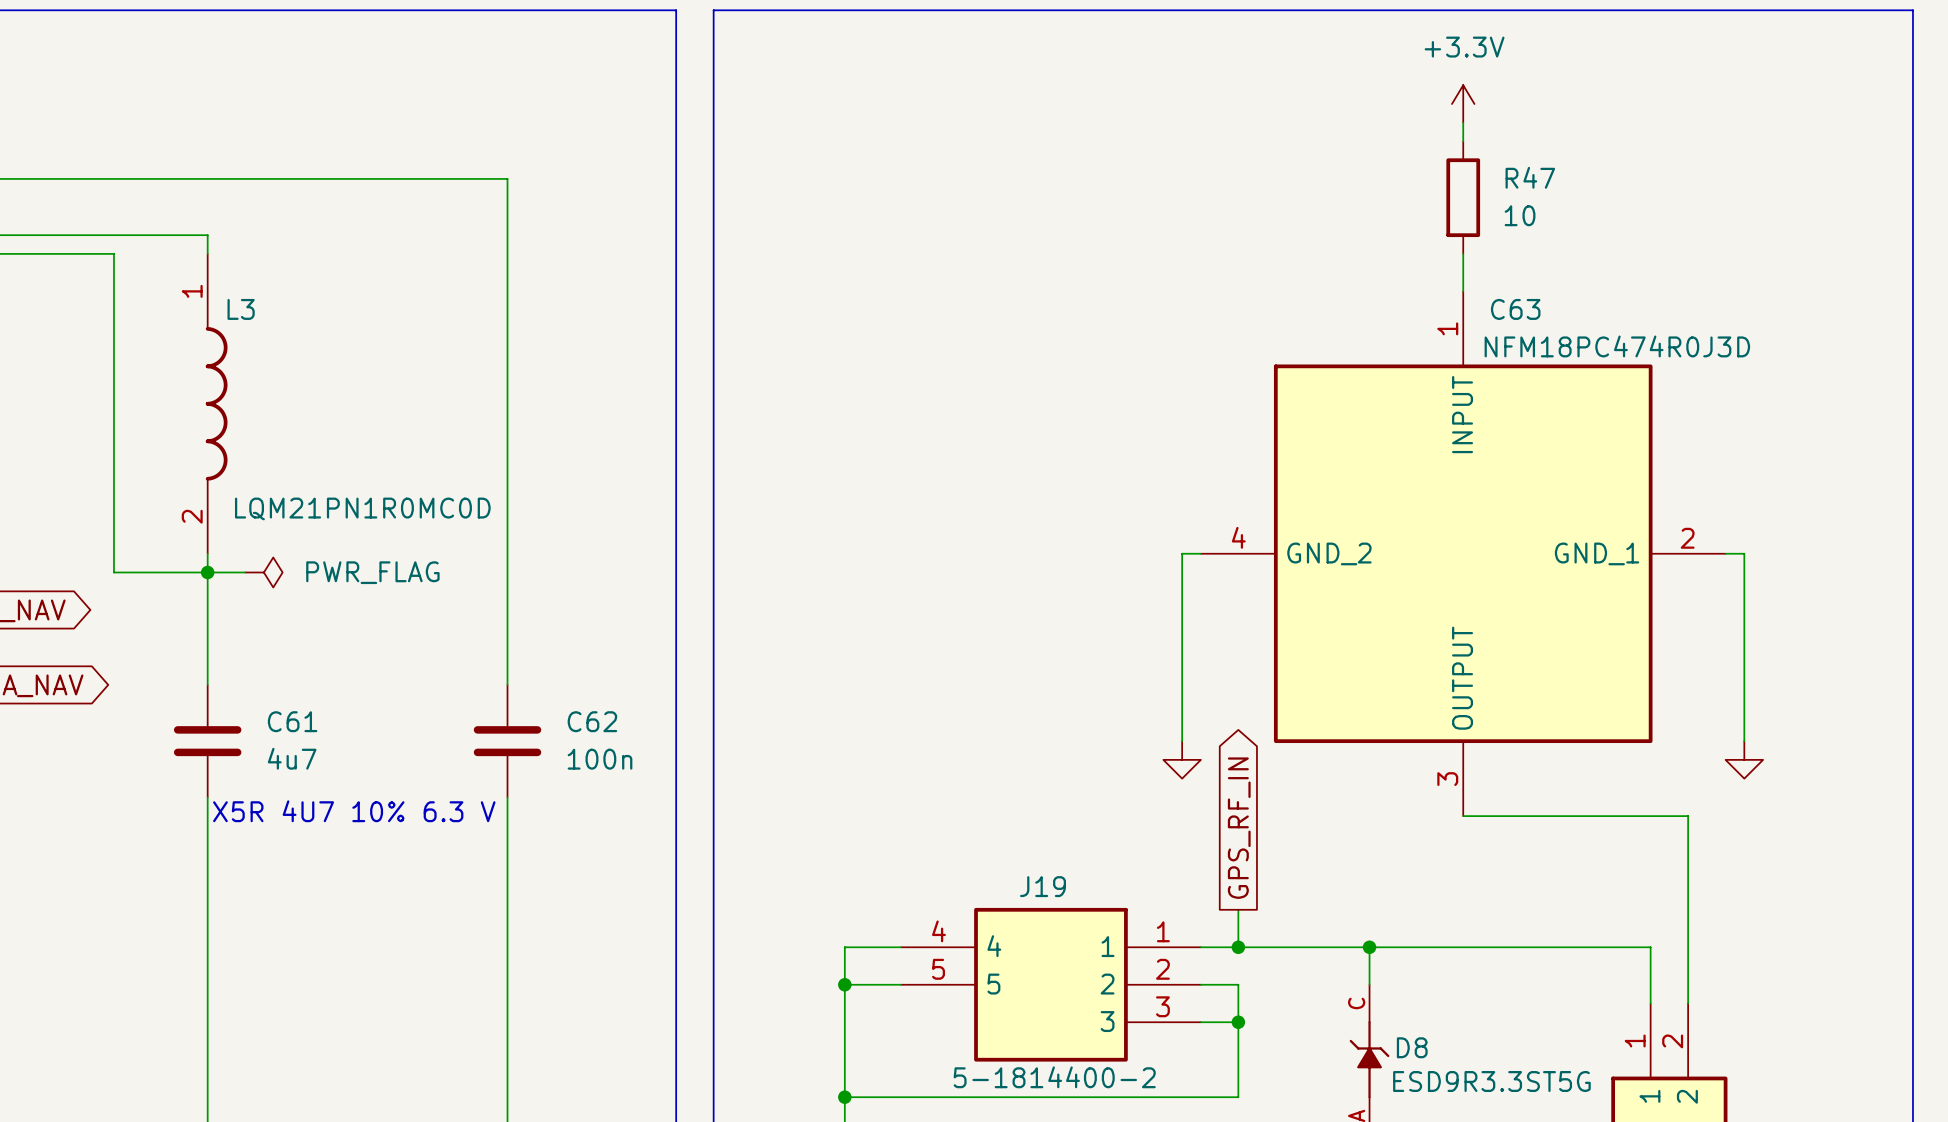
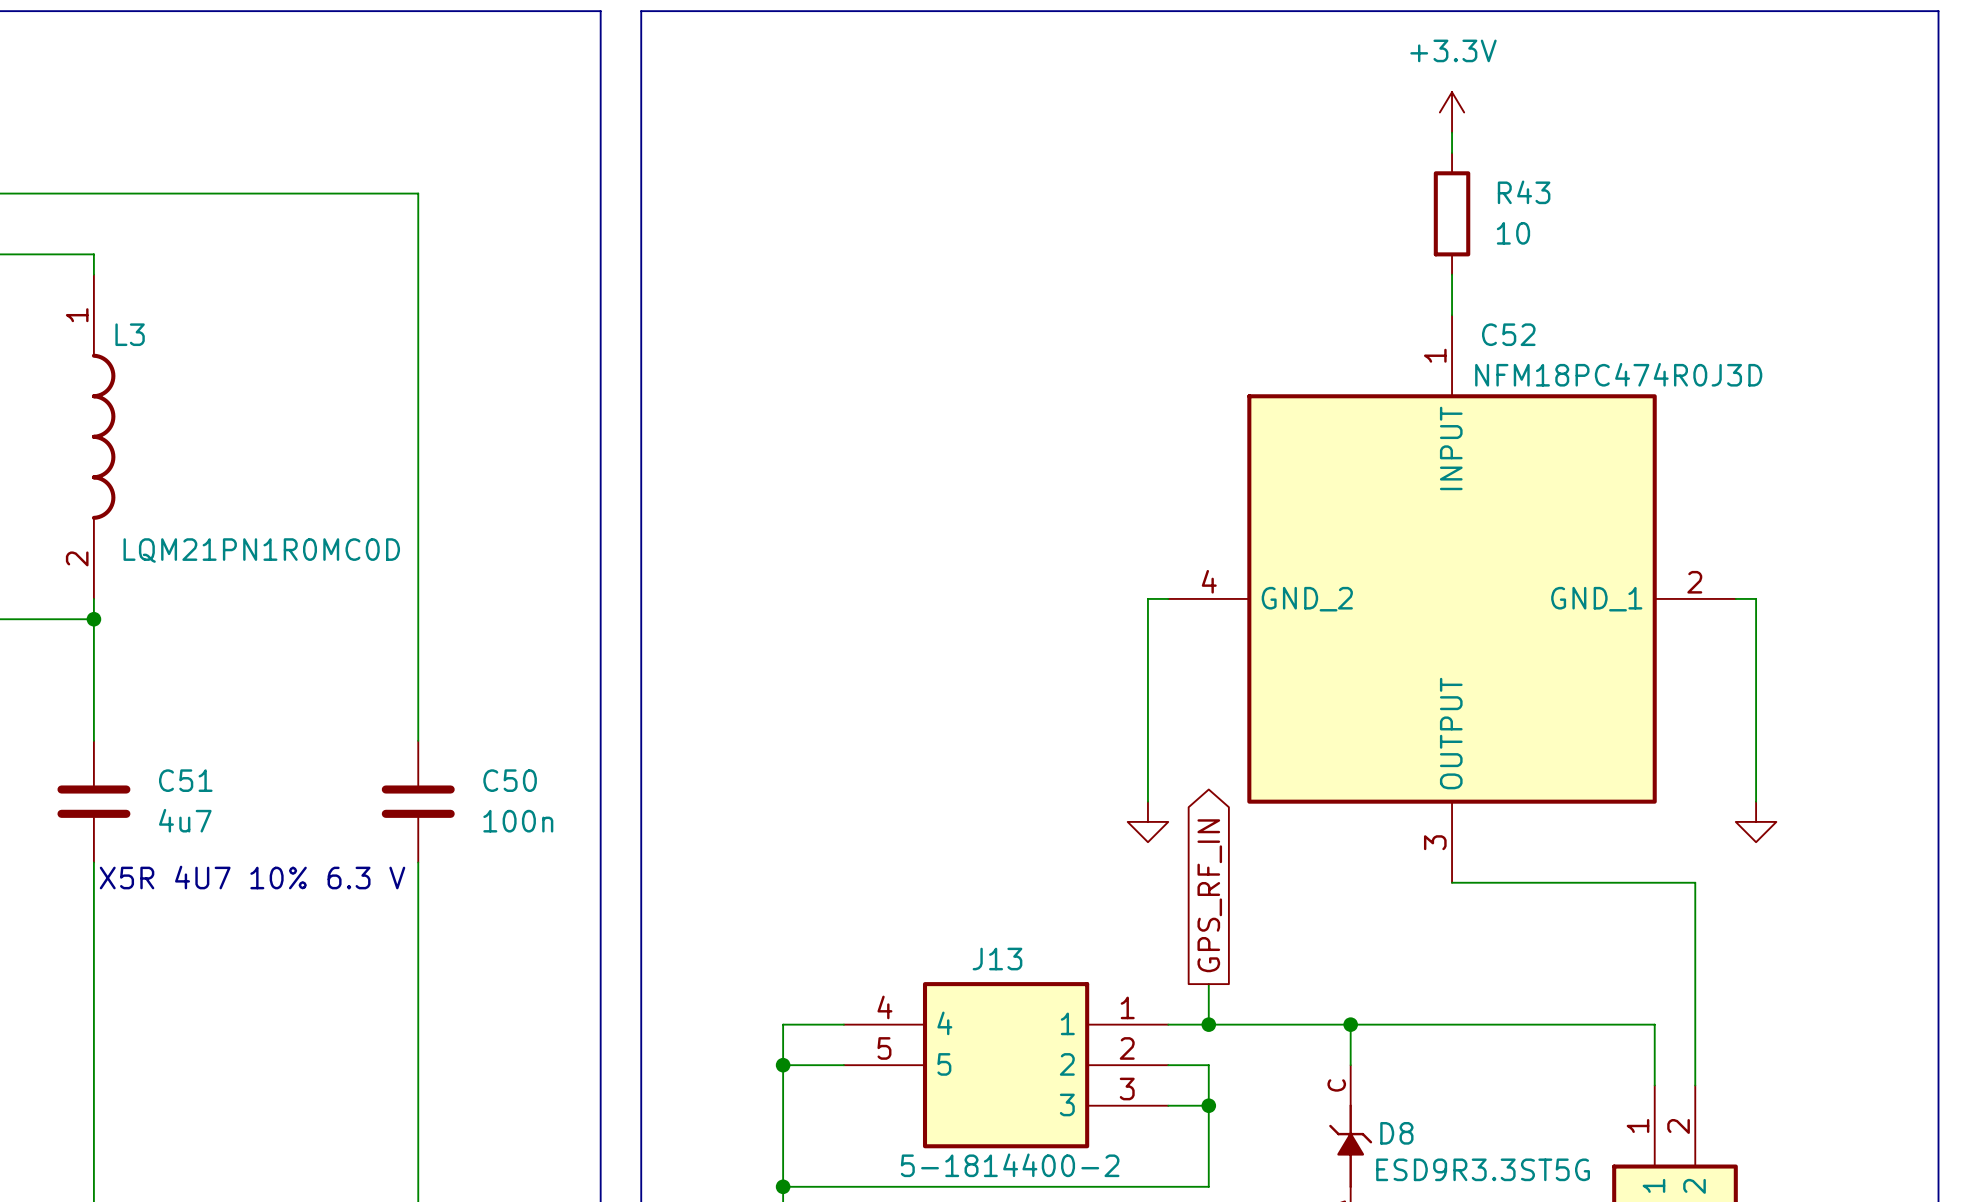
R47 name: R47 (1530, 177) -> R43 (1524, 192)
C63 name: C63 (1515, 309) -> C52 (1508, 334)
wire: (207, 572) (245, 572) -> none
power symbol: PWR_FLAG (263, 572) -> none
C61 name: C61 (292, 721) -> C51 (185, 780)
C62 name: C62 (592, 721) -> C50 (510, 780)
J19 name: J19 (1043, 886) -> J13 (997, 959)

